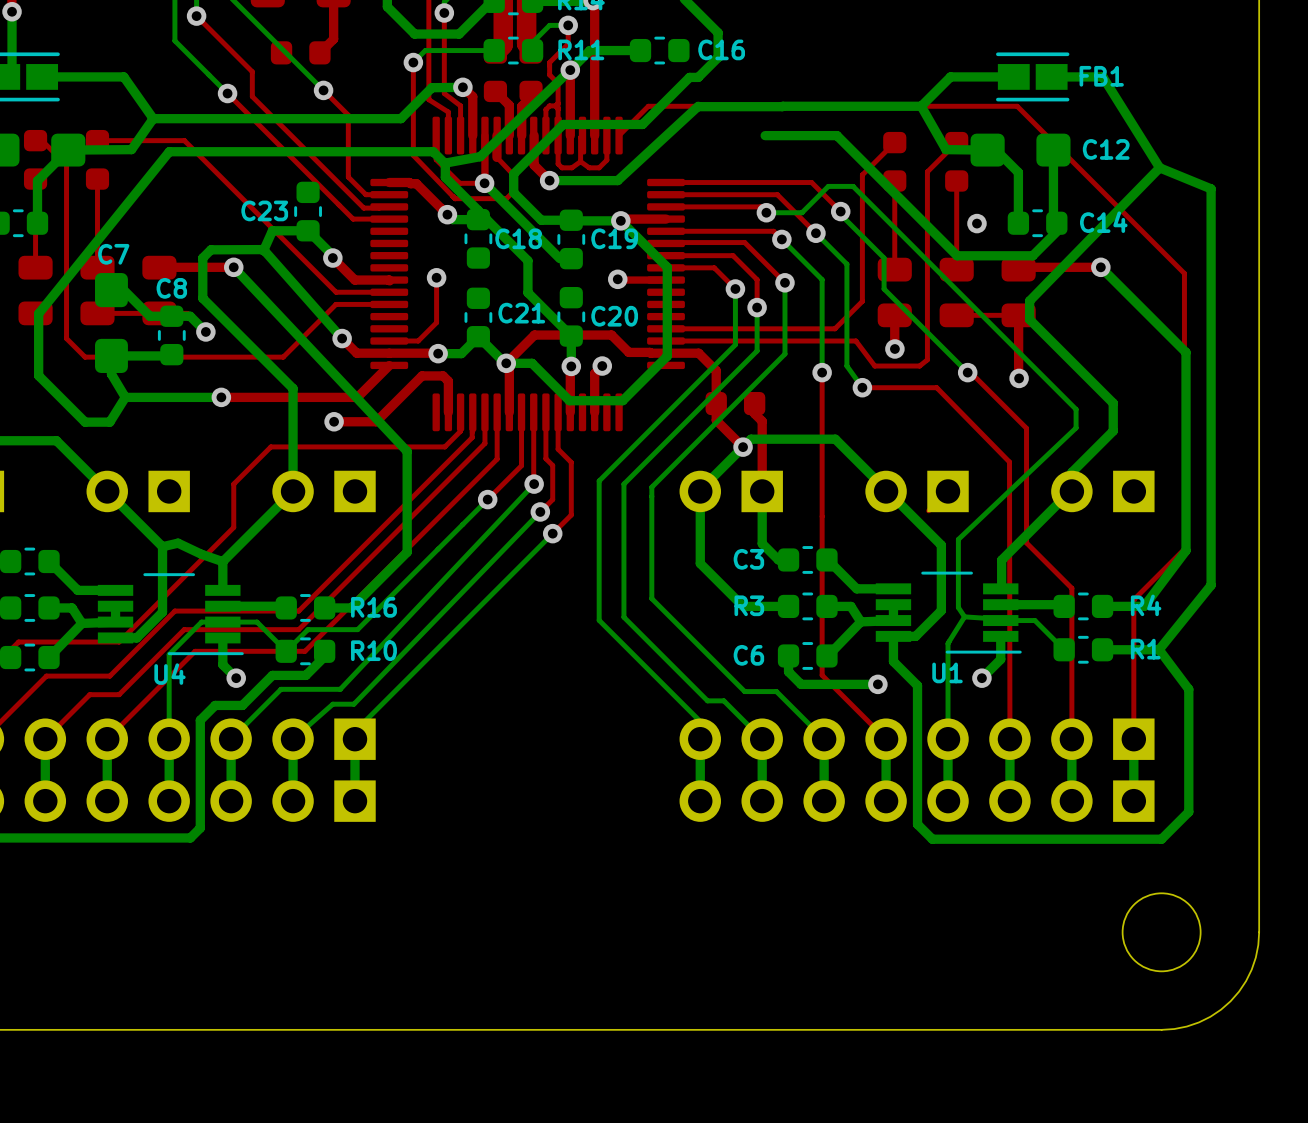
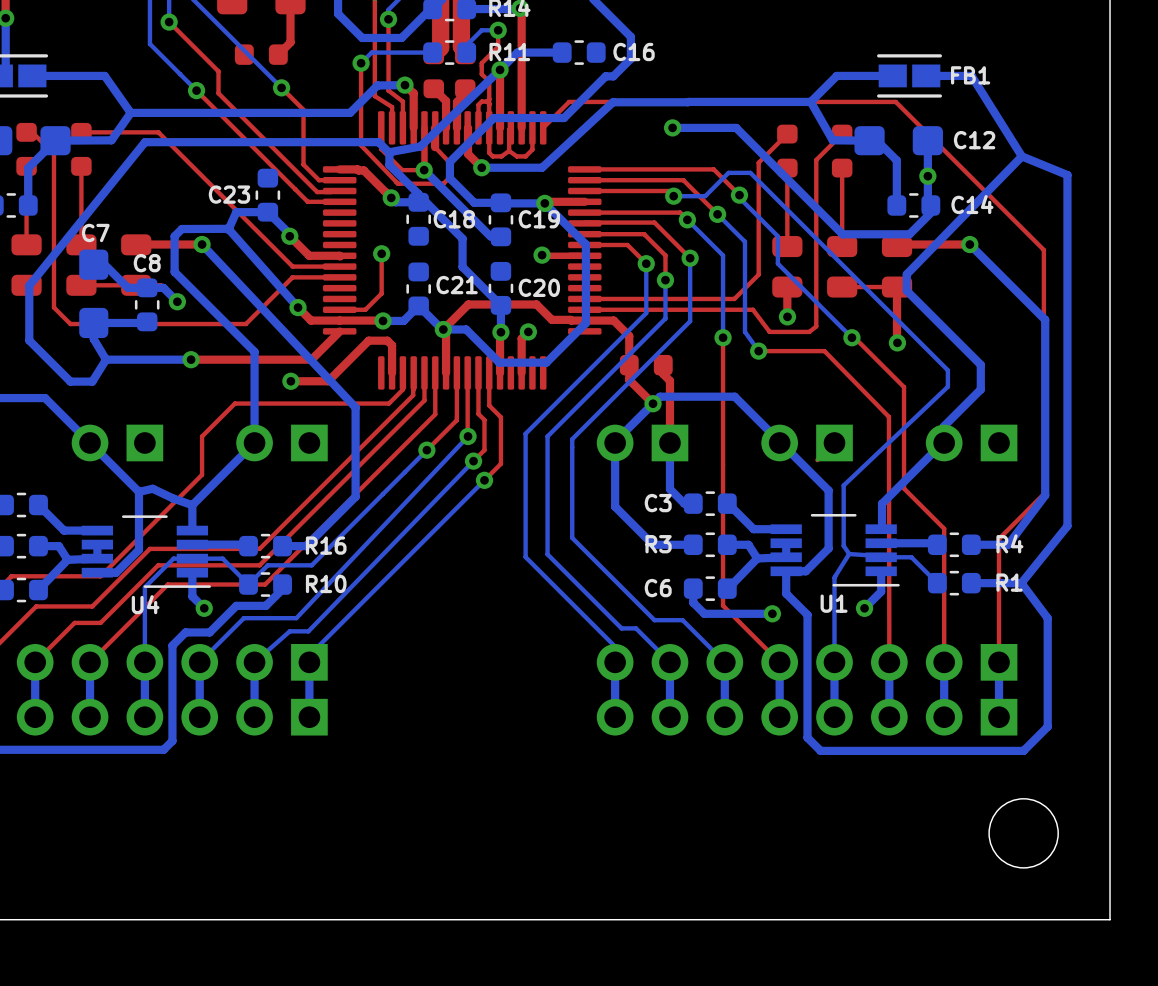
via: none -> (672, 127)
via position: (976, 223) -> (927, 176)
board edge: (1259, 932) (1255, 957) (1251, 969) (1239, 991) (1230, 1001) (1210, 1016) (1198, 1022) (1186, 1026) (1161, 1029) -> (1110, 833) (1110, 919) (1023, 919)

